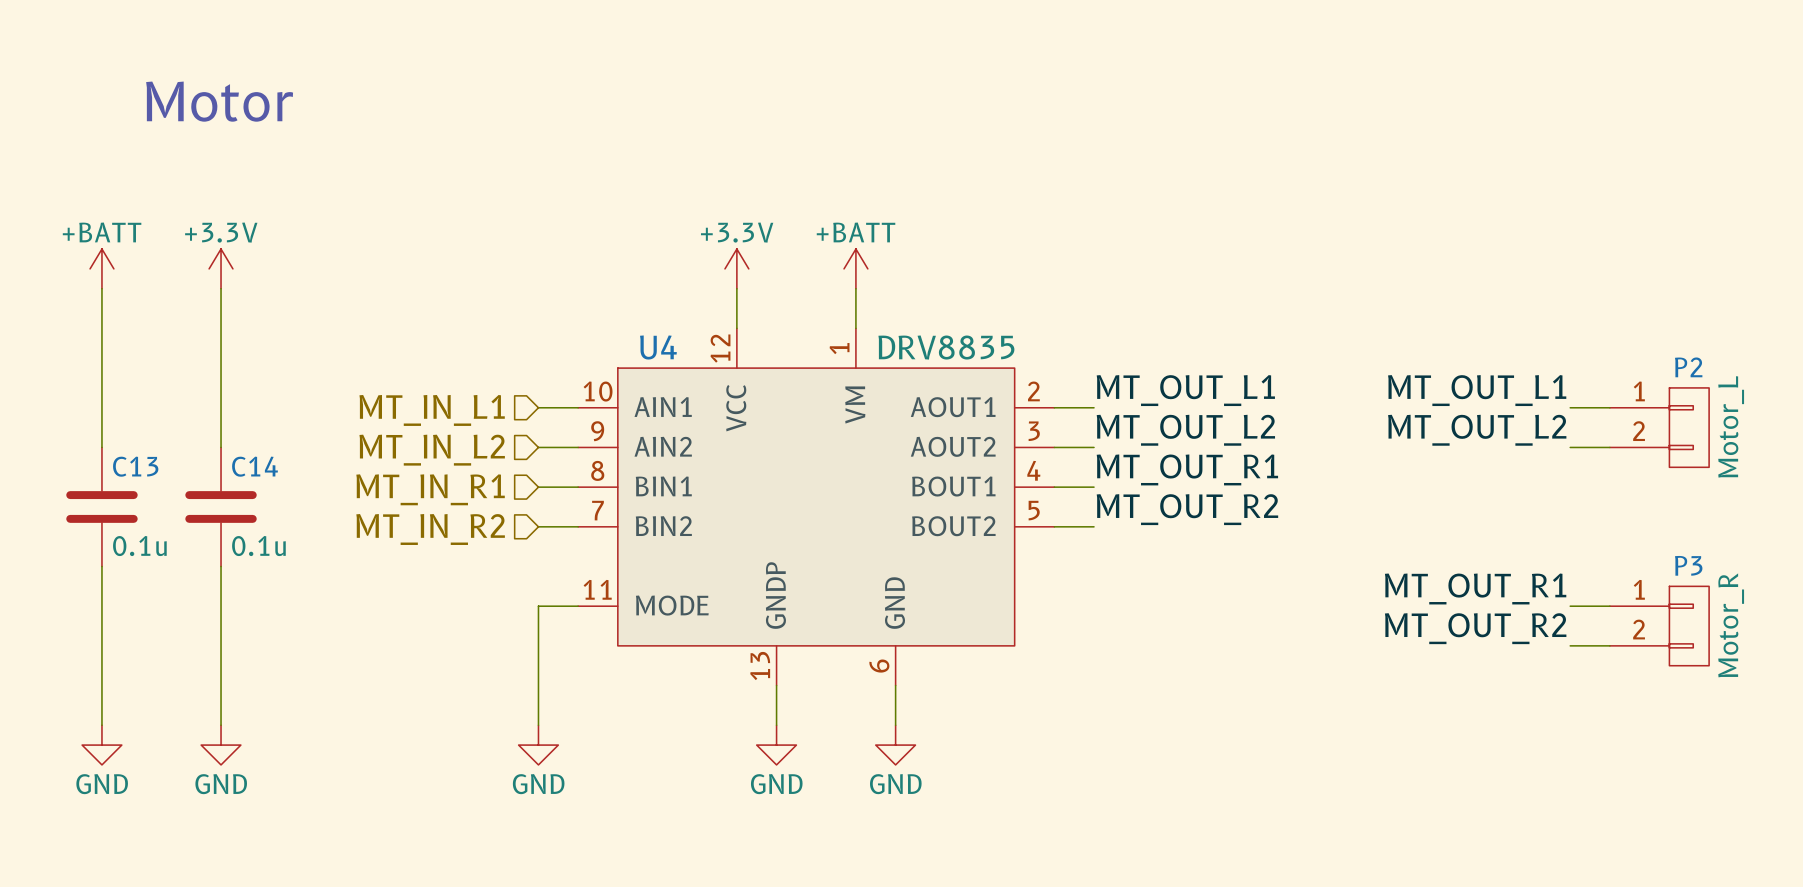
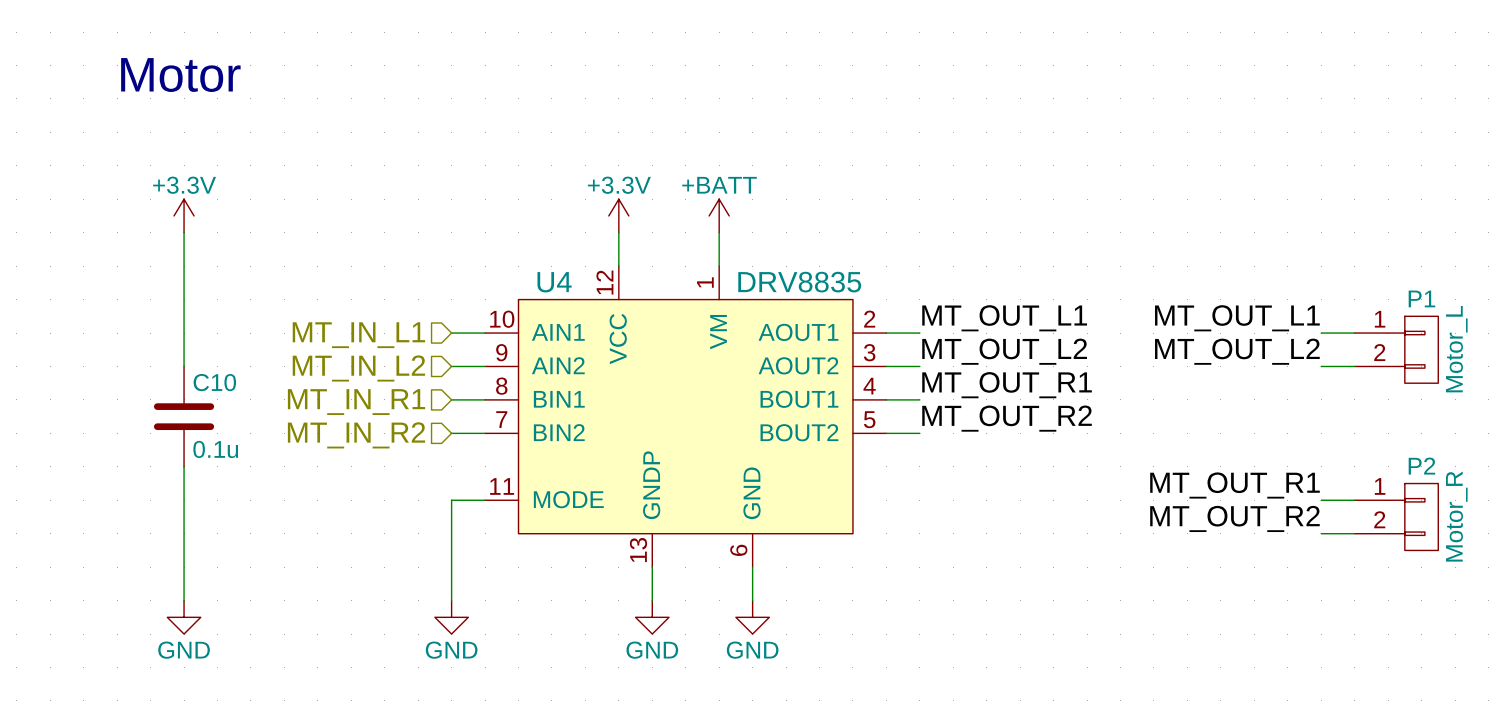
power symbol: +BATT (101, 268) -> none
wire: (101, 288) (101, 447) -> none
P2 name: P2 (1688, 367) -> P1 (1421, 298)
C14 name: C14 (255, 466) -> C10 (214, 382)
C13: 0.1u (101, 506) -> none
P3 name: P3 (1688, 565) -> P2 (1421, 466)
wire: (101, 566) (101, 725) -> none
power symbol: GND (101, 745) -> none

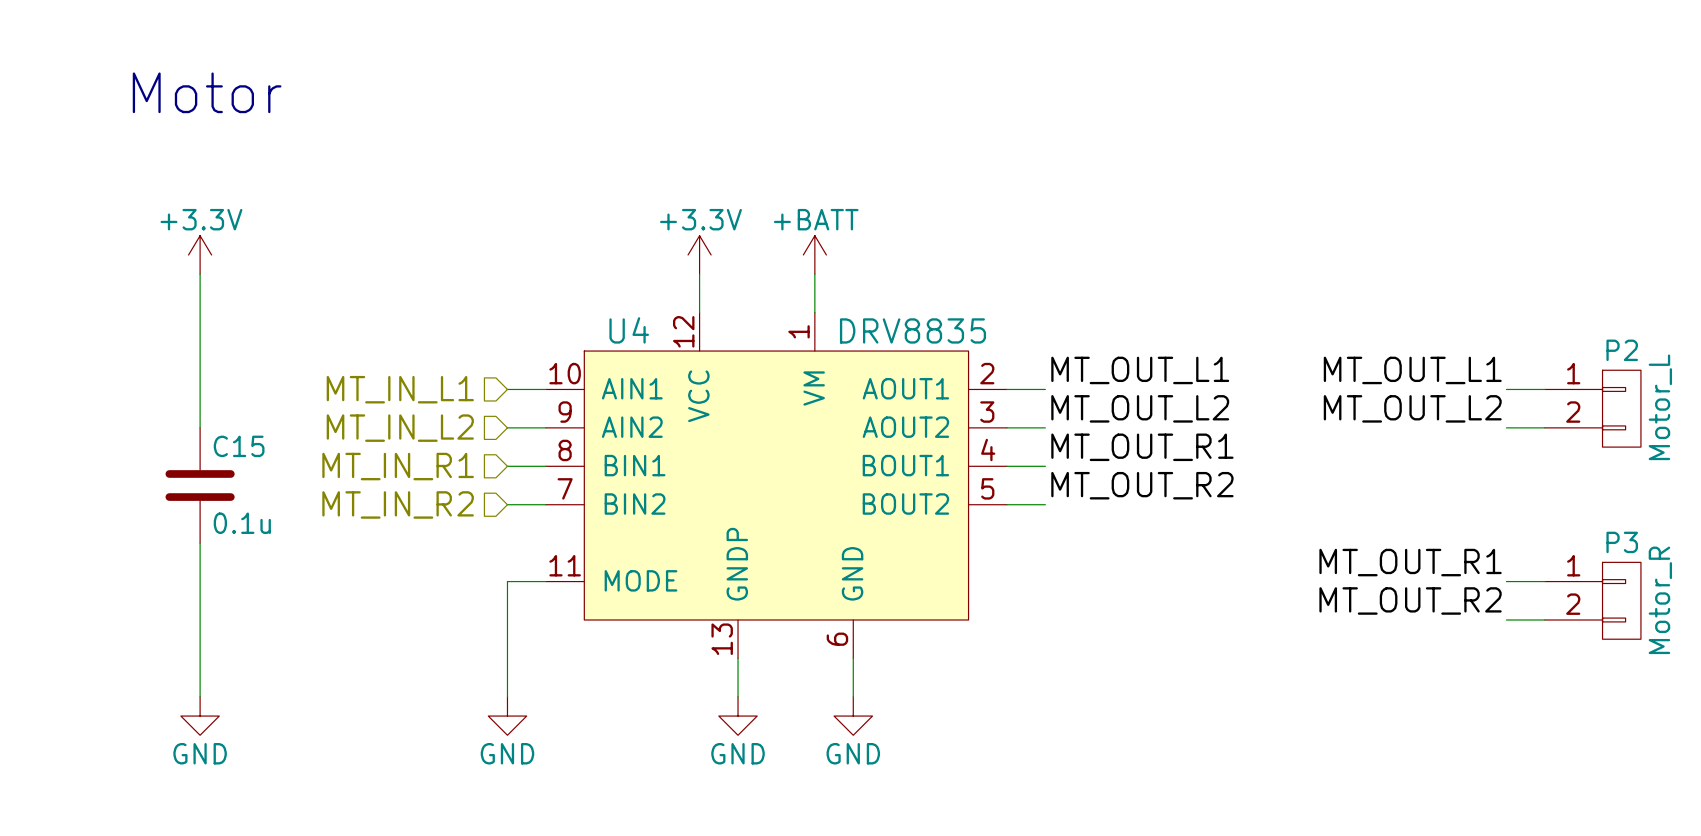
P1 name: P1 (1421, 298) -> P2 (1622, 350)
C10 name: C10 (214, 382) -> C15 (239, 446)
P2 name: P2 (1421, 466) -> P3 (1622, 542)

